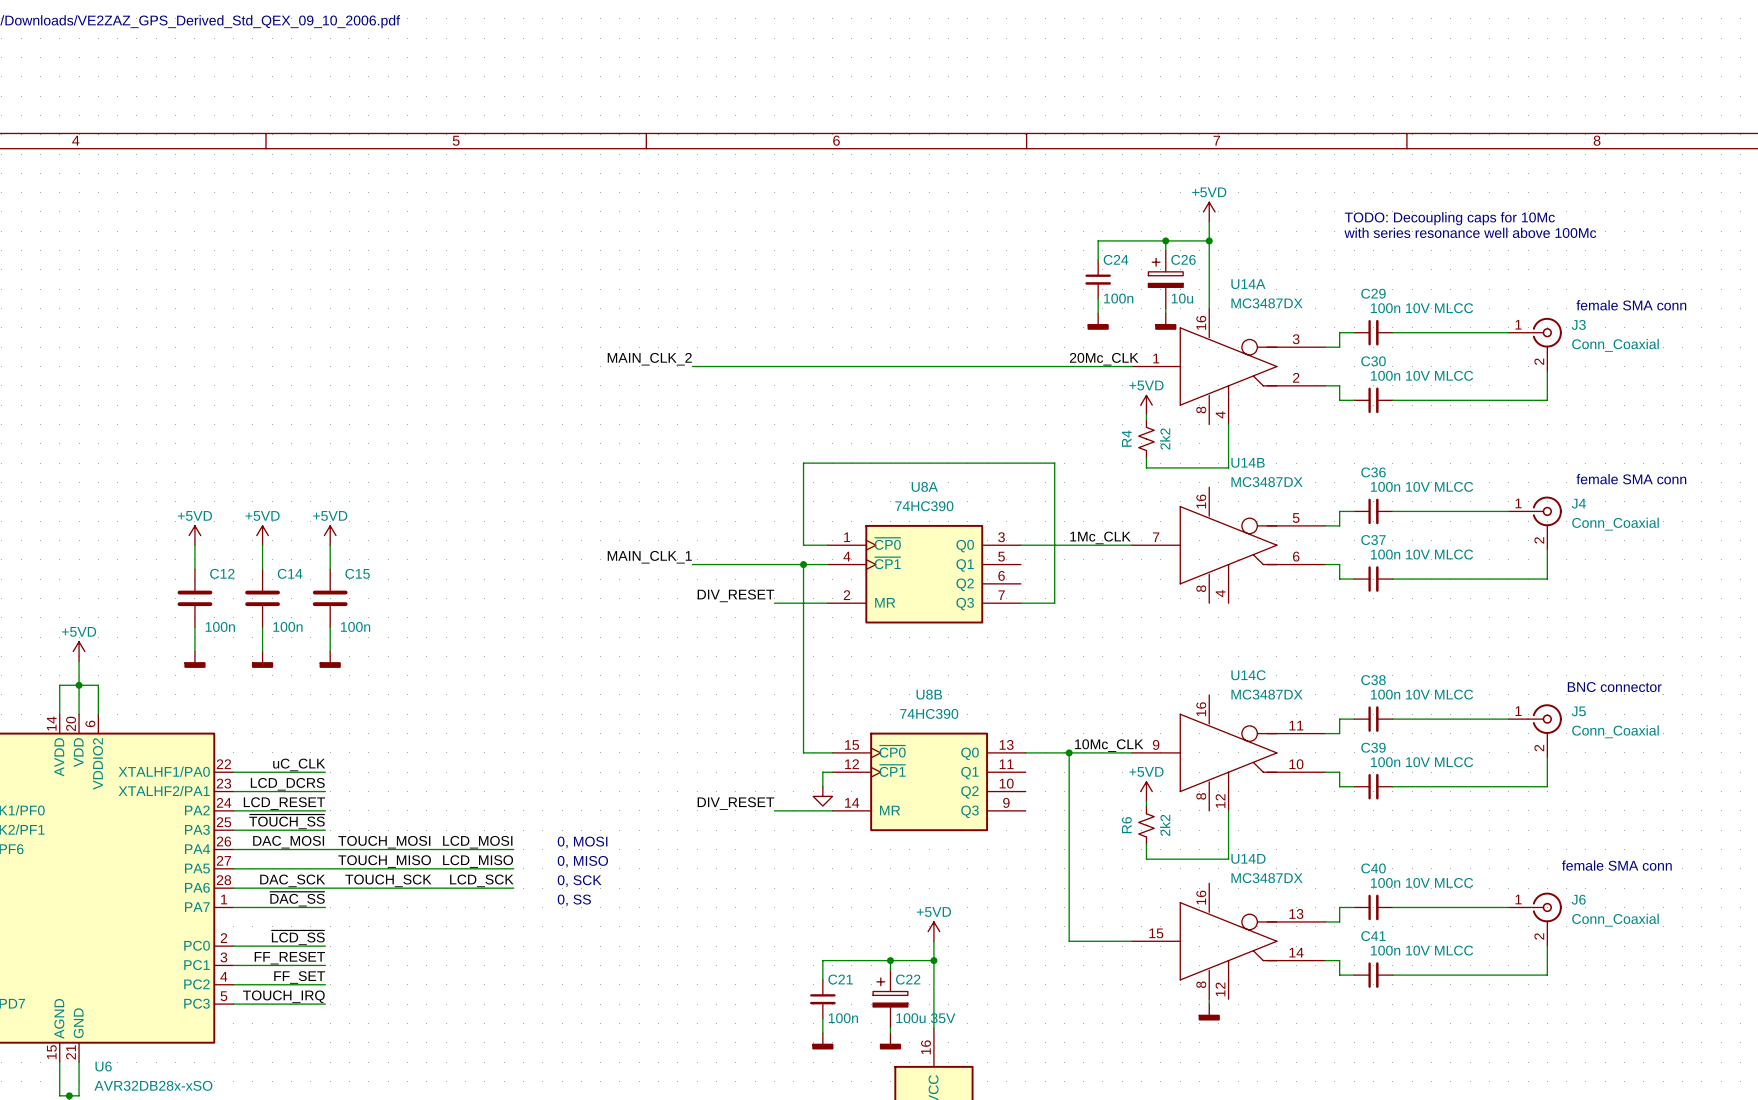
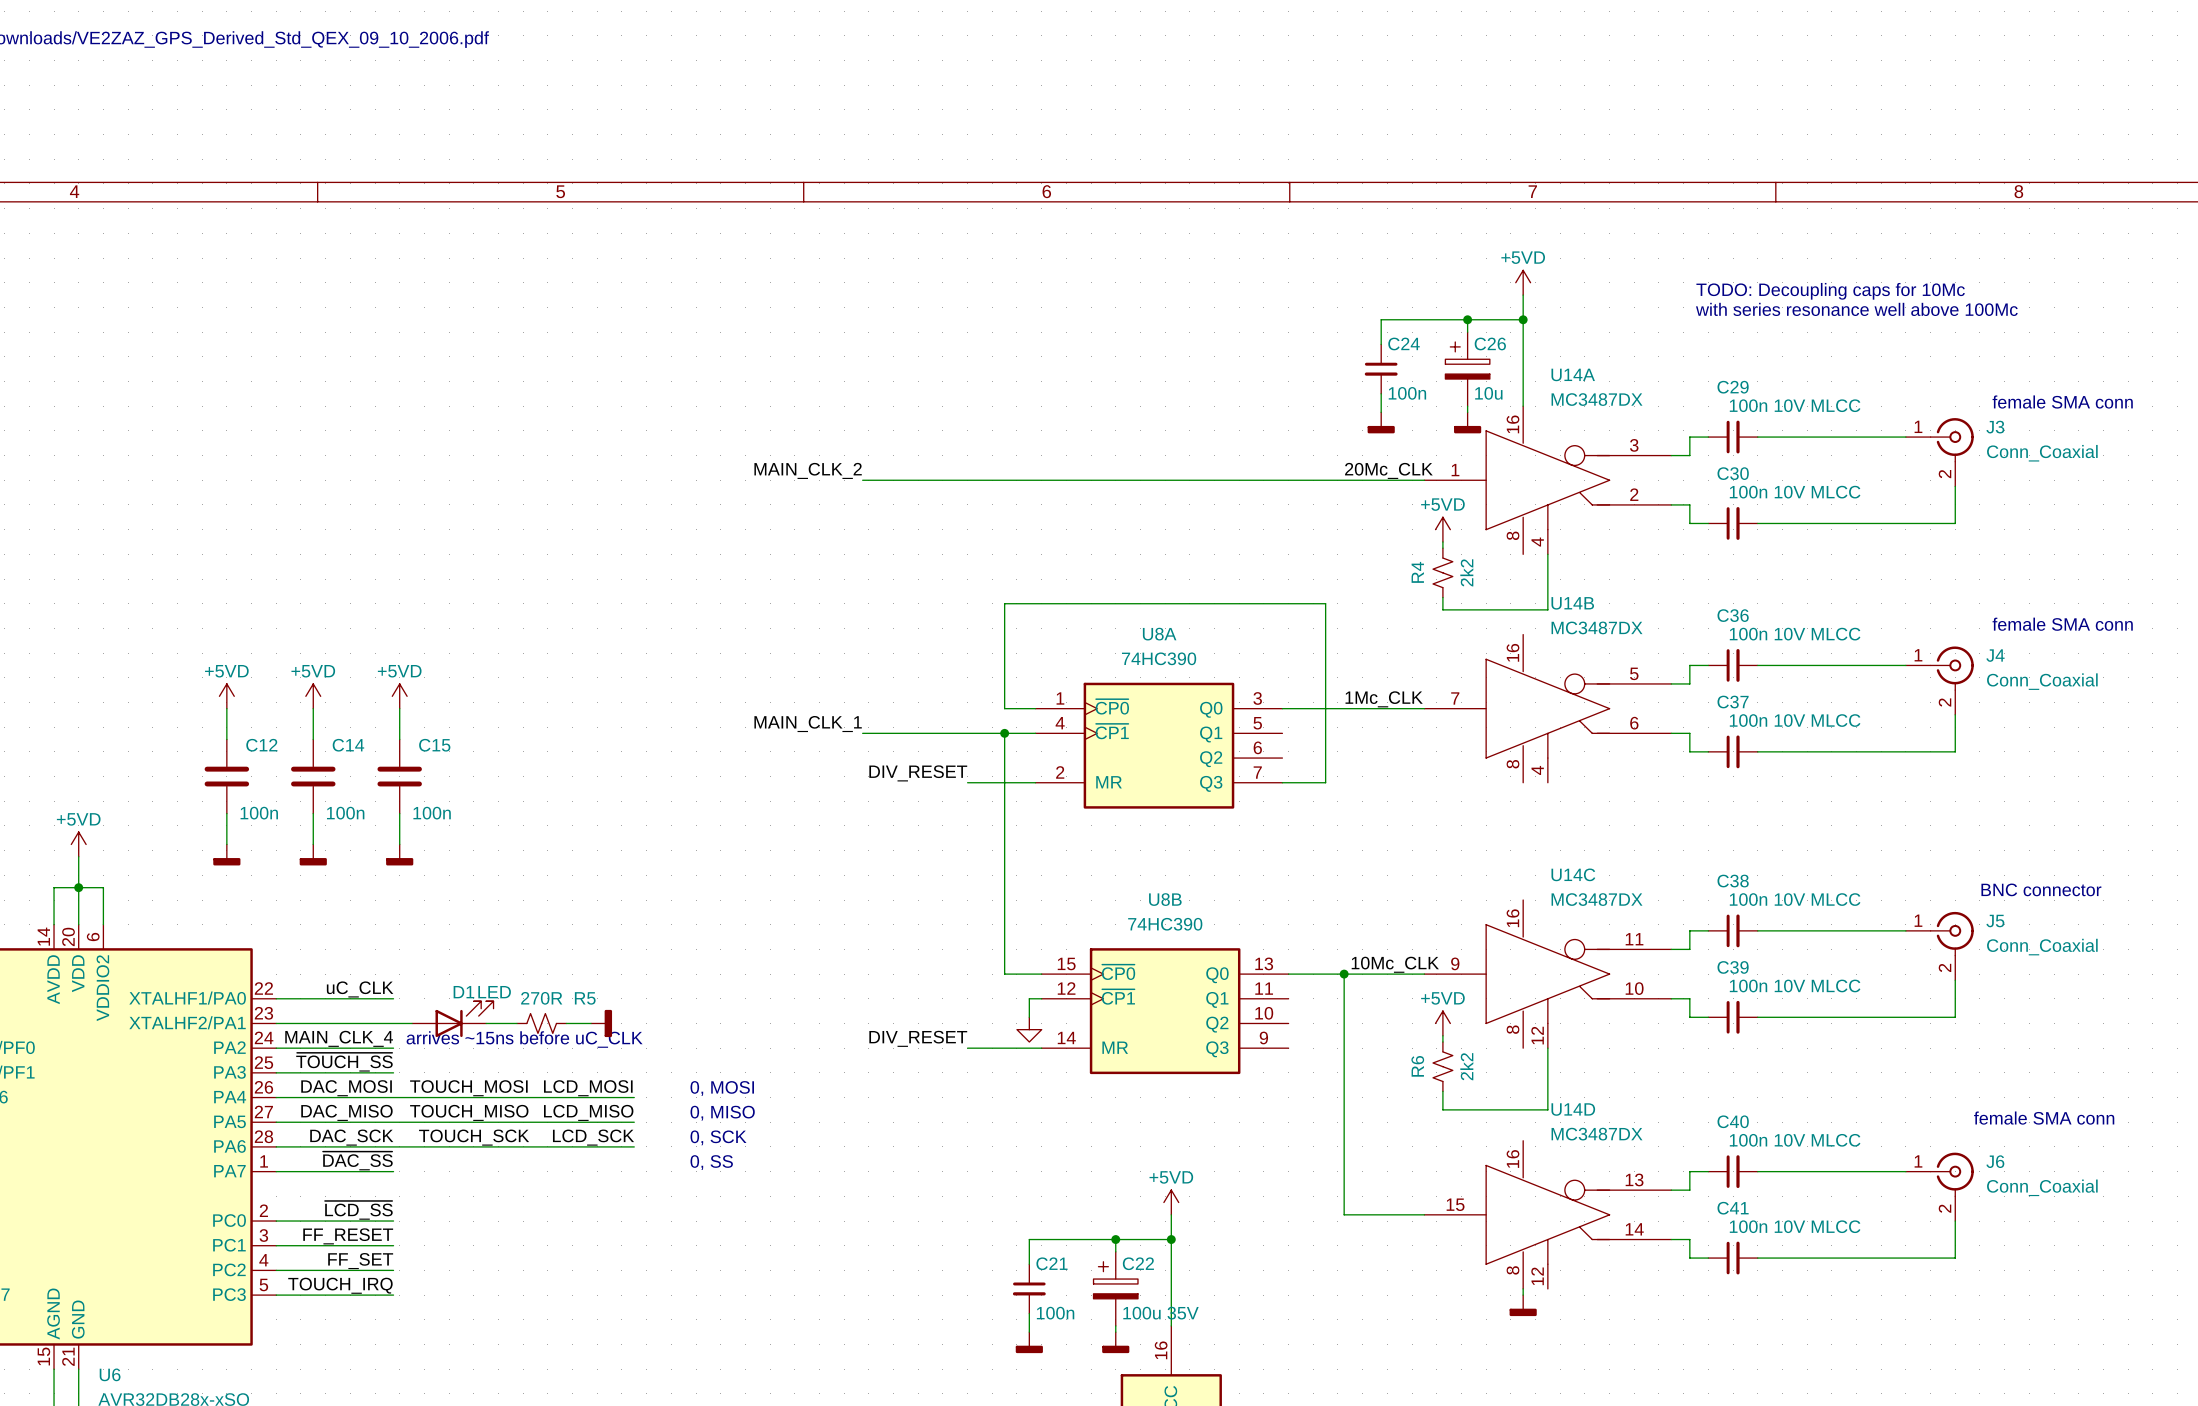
label: LCD_DCRS (287, 784) -> none
D1: none -> LED (452, 1019)
wire: none -> (393, 1023) (412, 1023)
wire: none -> (486, 1023) (516, 1023)
R5: none -> 270R (541, 1023)
wire: none -> (566, 1023) (591, 1023)
power symbol: none -> (601, 1023)
label: LCD_RESET (284, 803) -> MAIN_CLK_4 (339, 1038)
text: none -> arrives ~15ns before uC_CLK (524, 1039)
label: none -> DAC_MISO (346, 1112)

